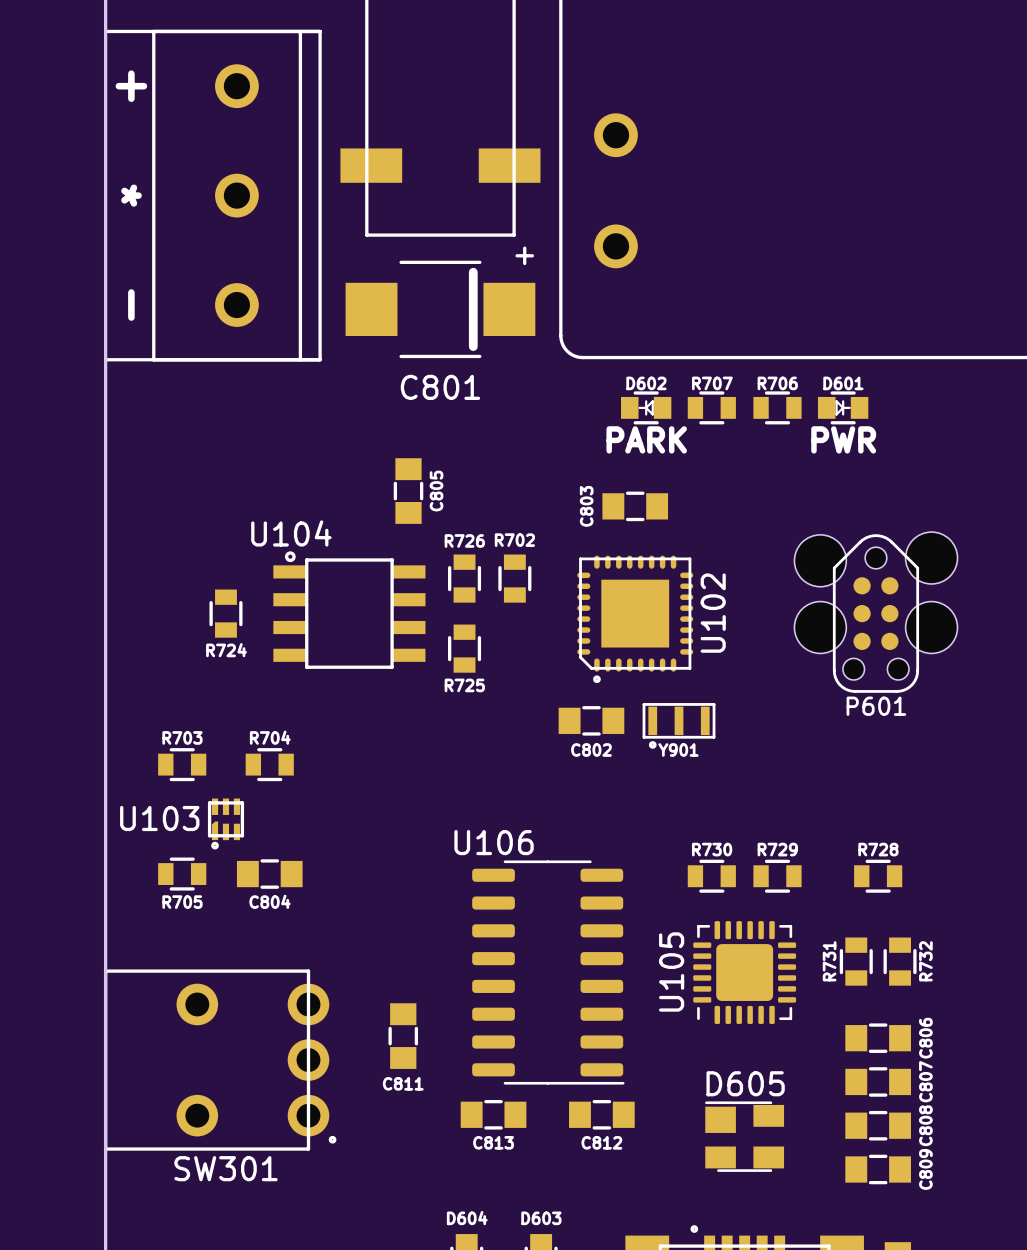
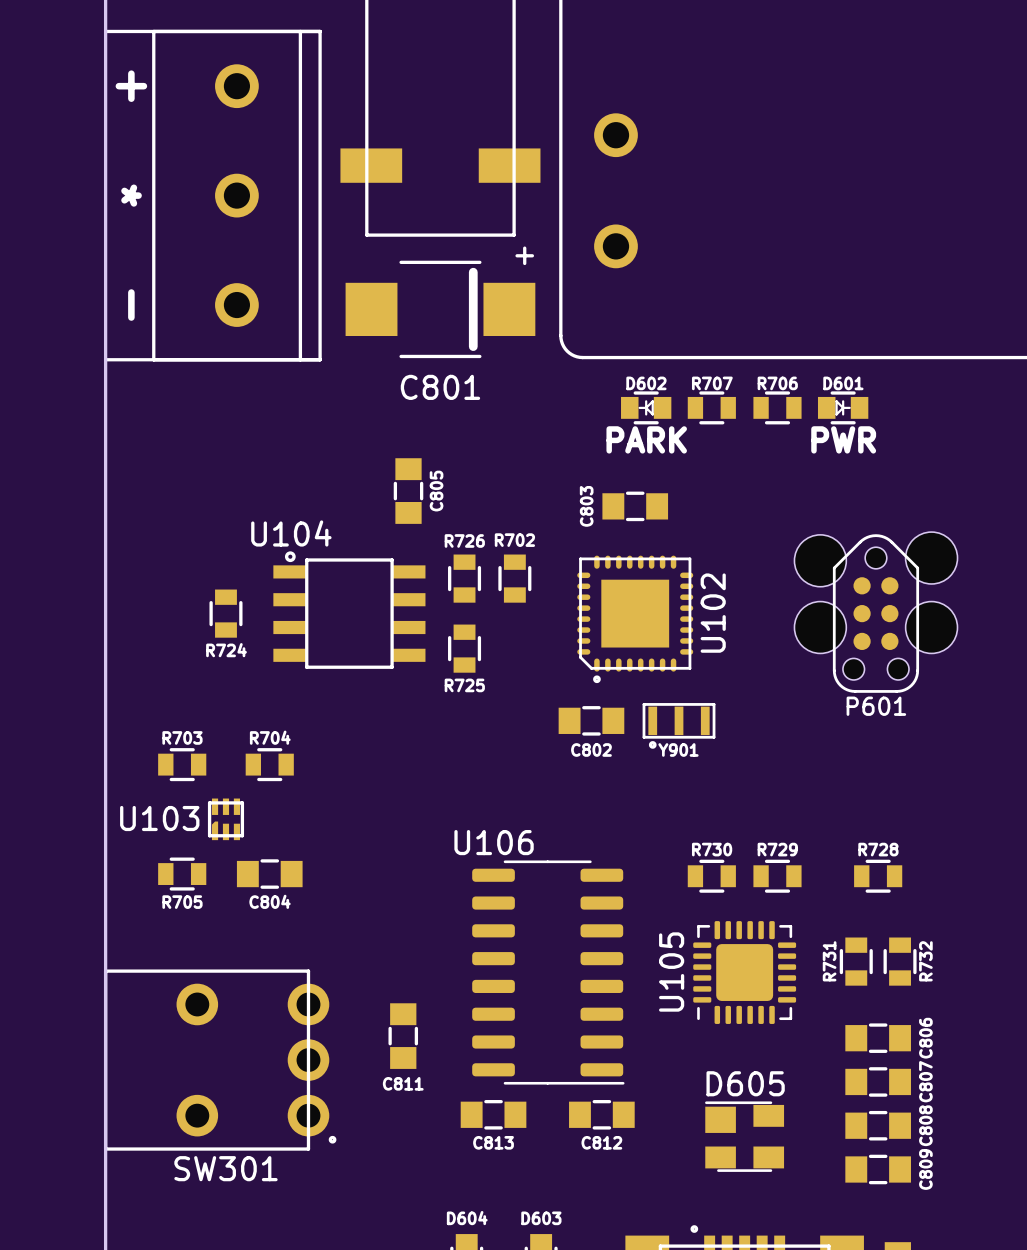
U103 footprint: [207, 798, 245, 850] -> [207, 798, 245, 841]

